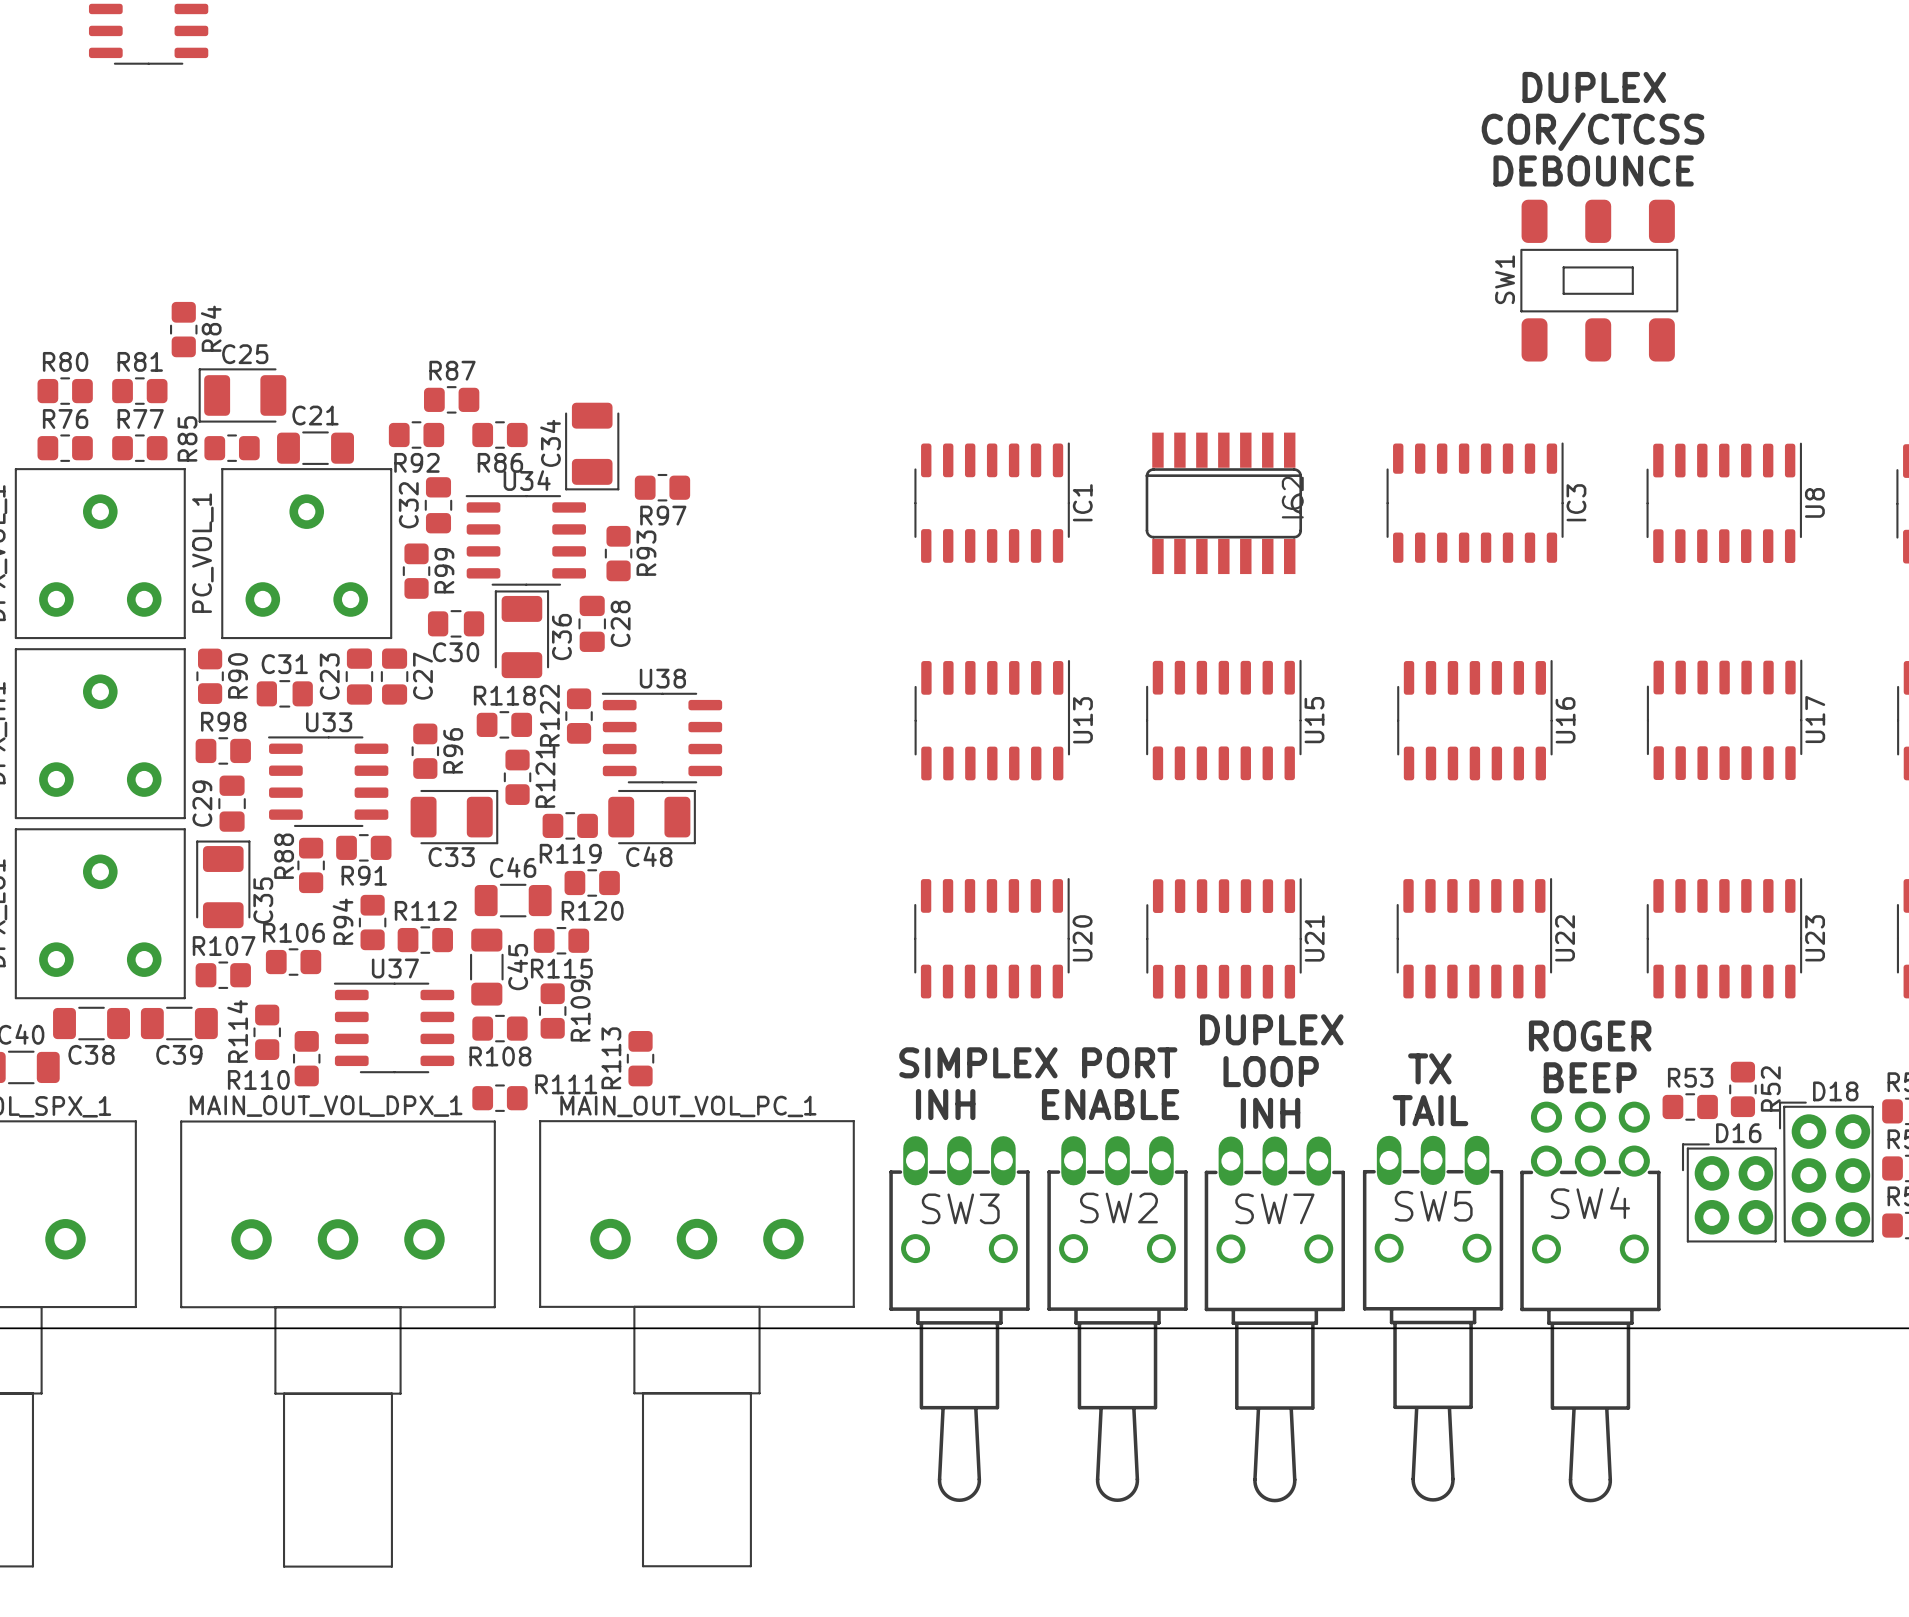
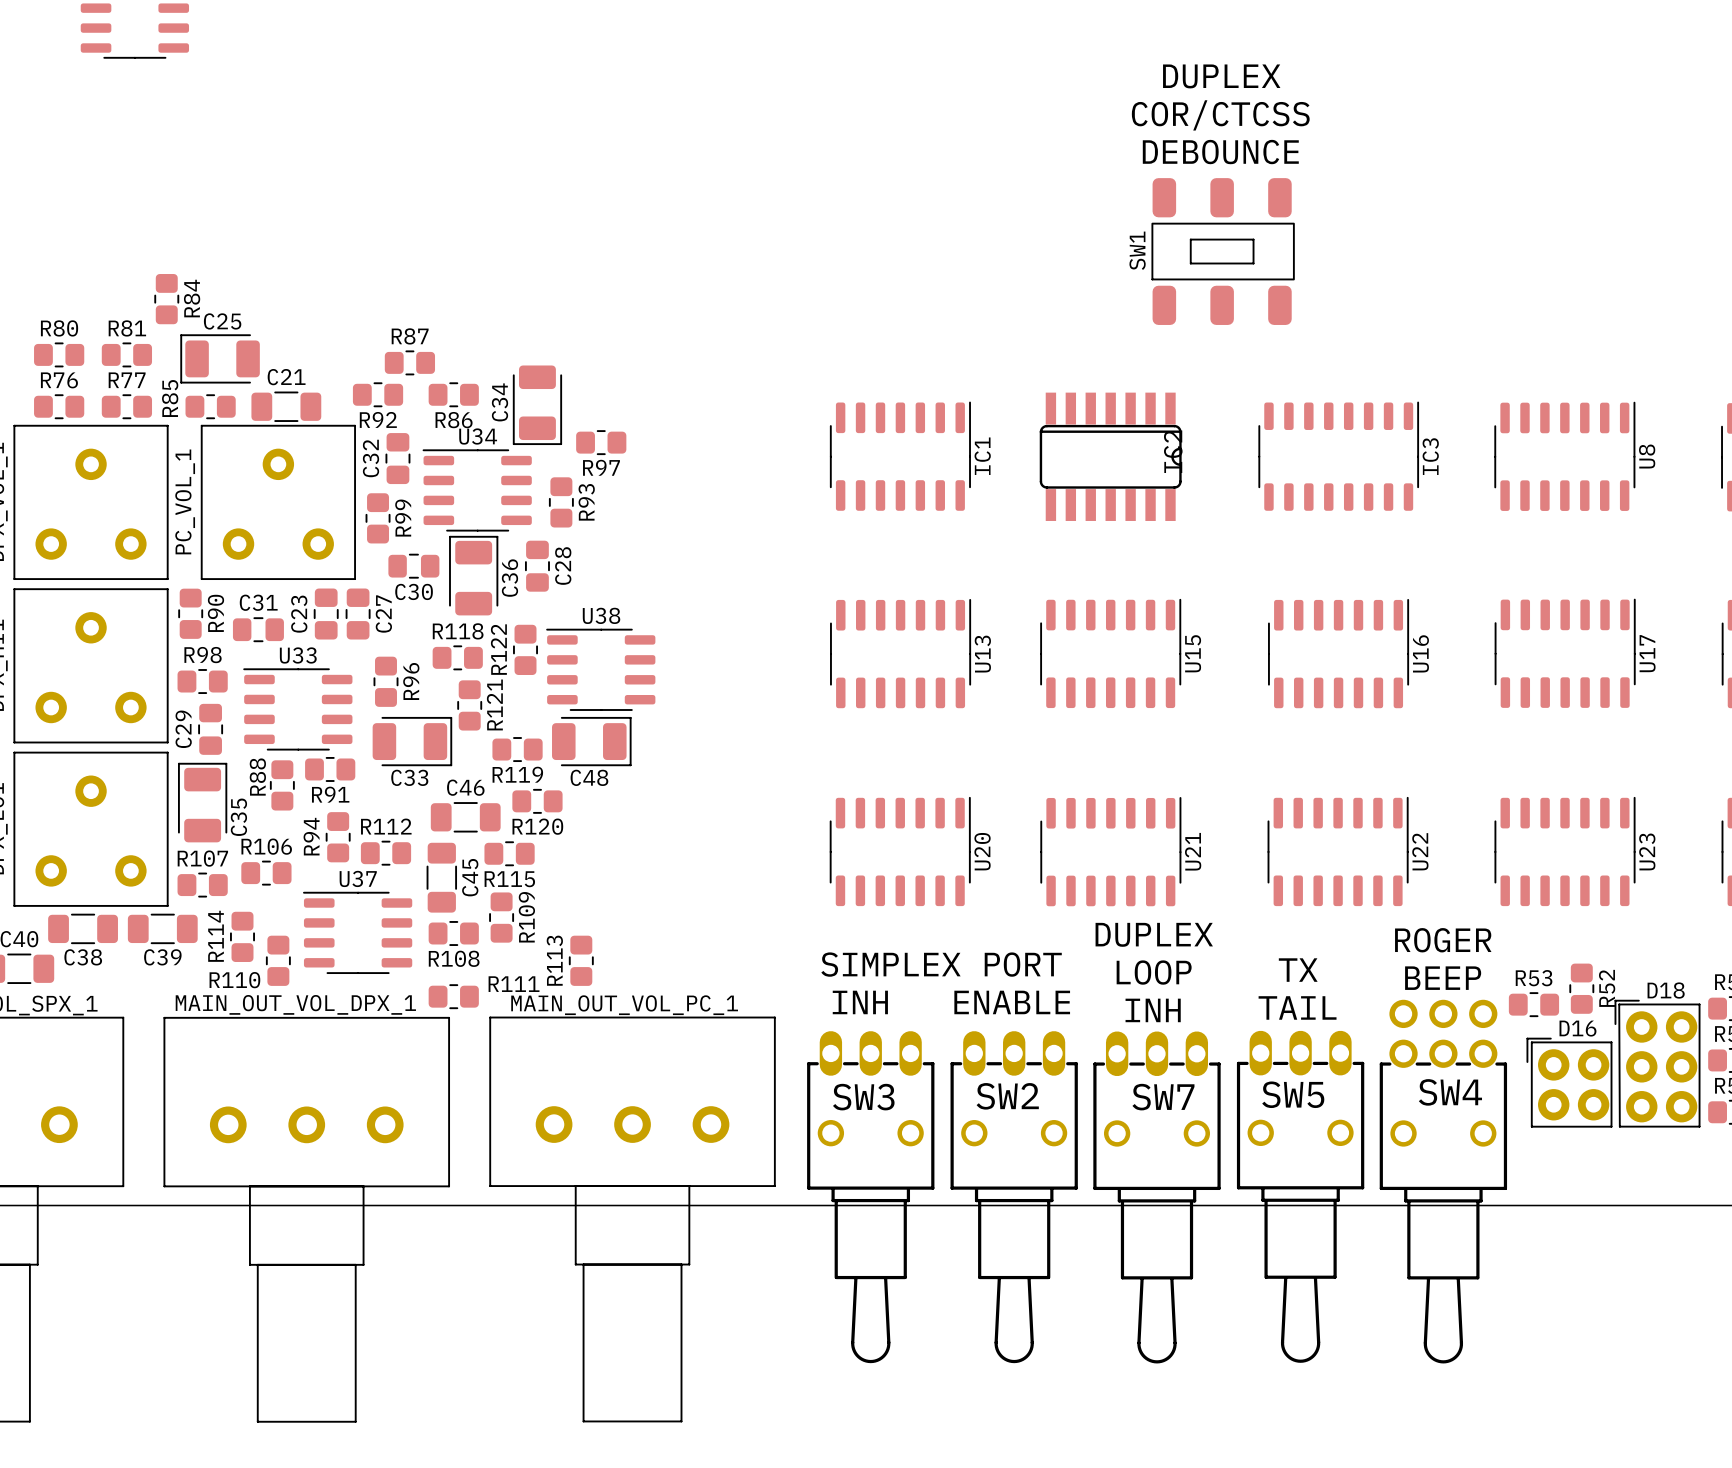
text position: DUPLEX (1594, 87) -> DUPLEX (1221, 76)
text position: COR/CTCSS (1593, 131) -> COR/CTCSS (1220, 115)
text position: DEBOUNCE (1593, 170) -> DEBOUNCE (1220, 152)
SW1 position: (1599, 280) -> (1223, 251)

